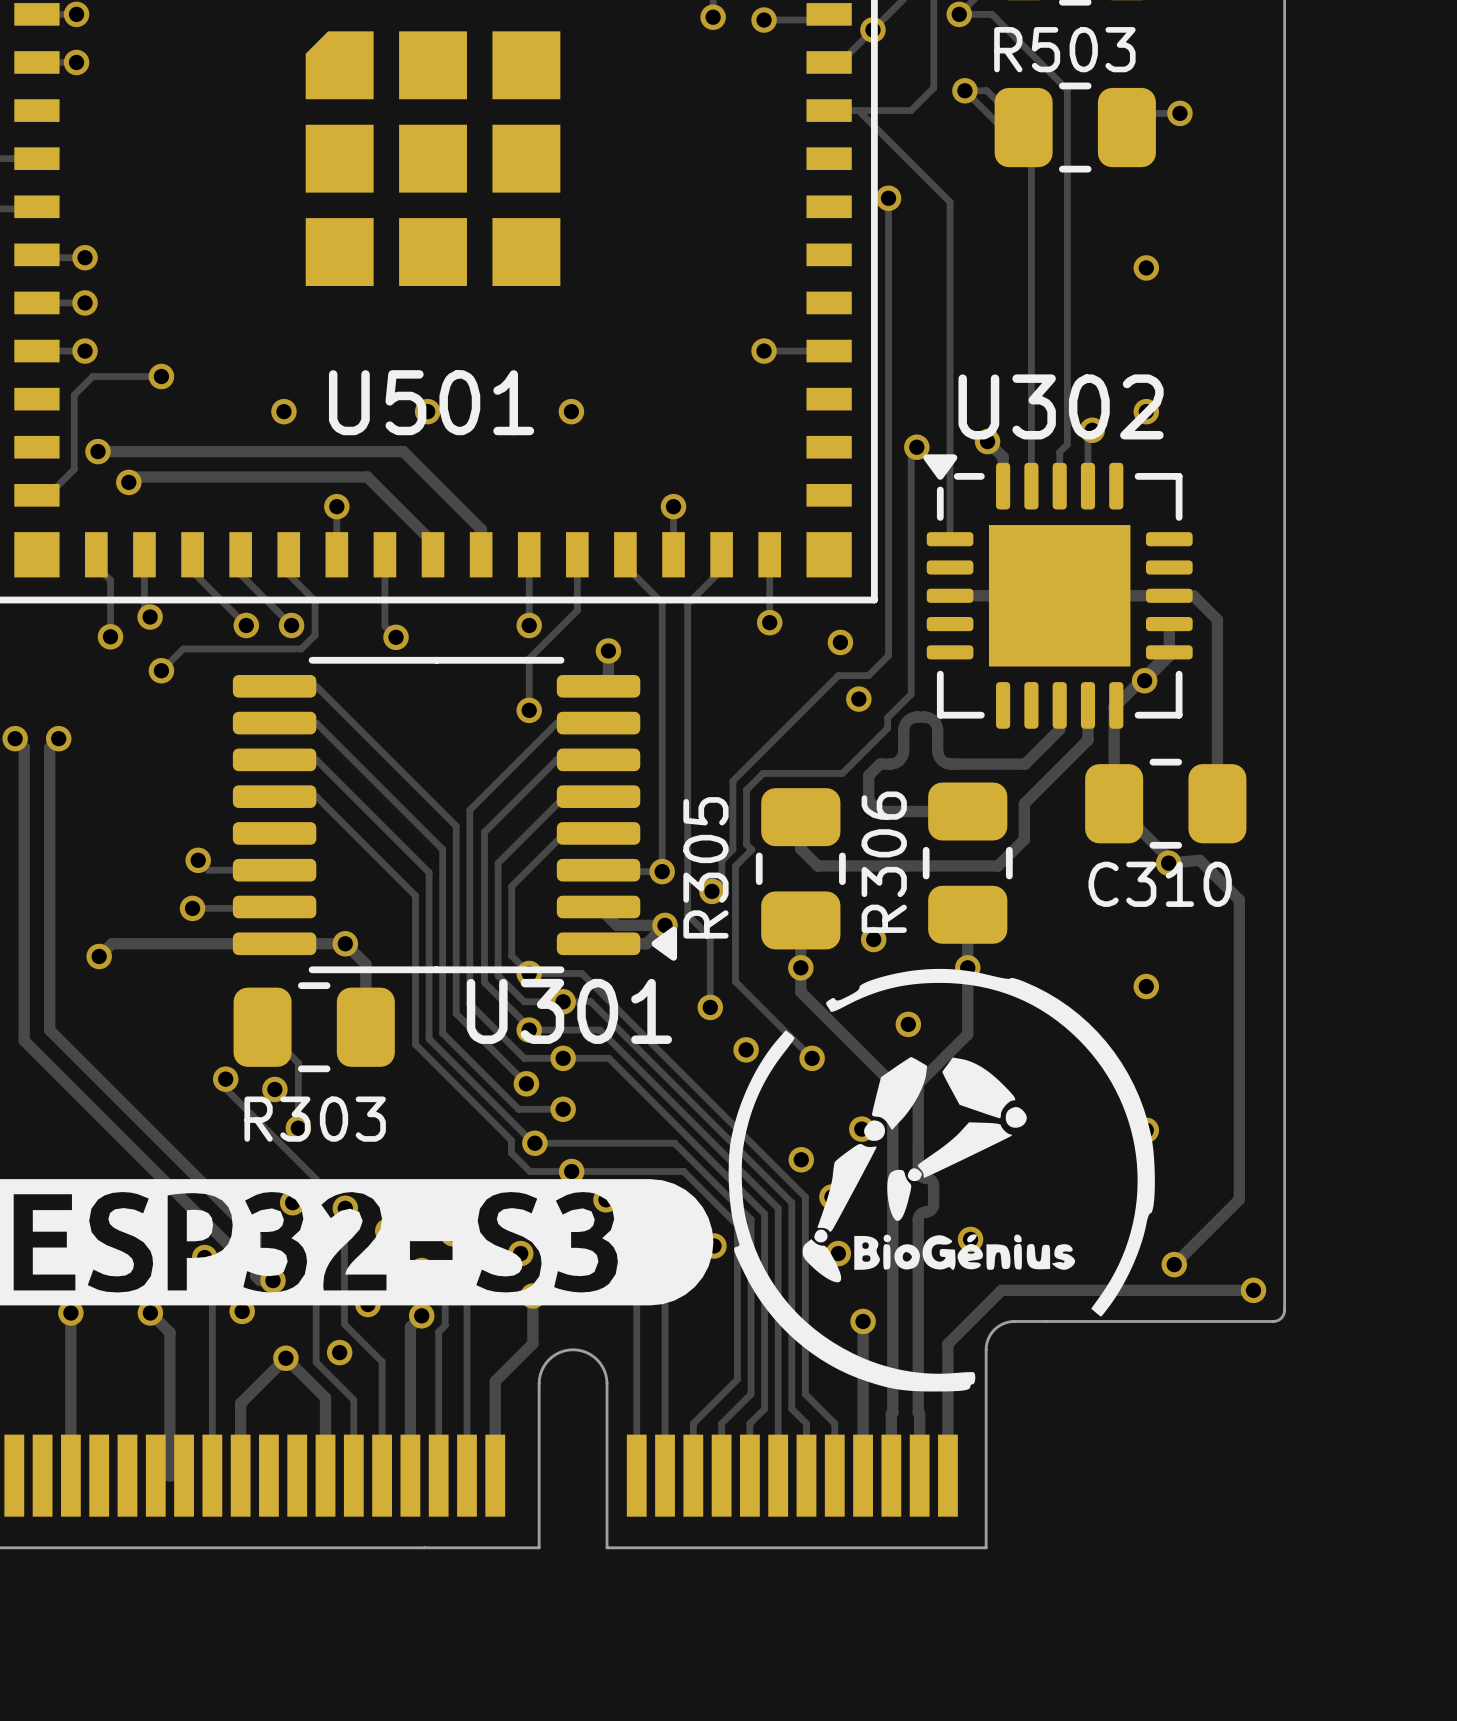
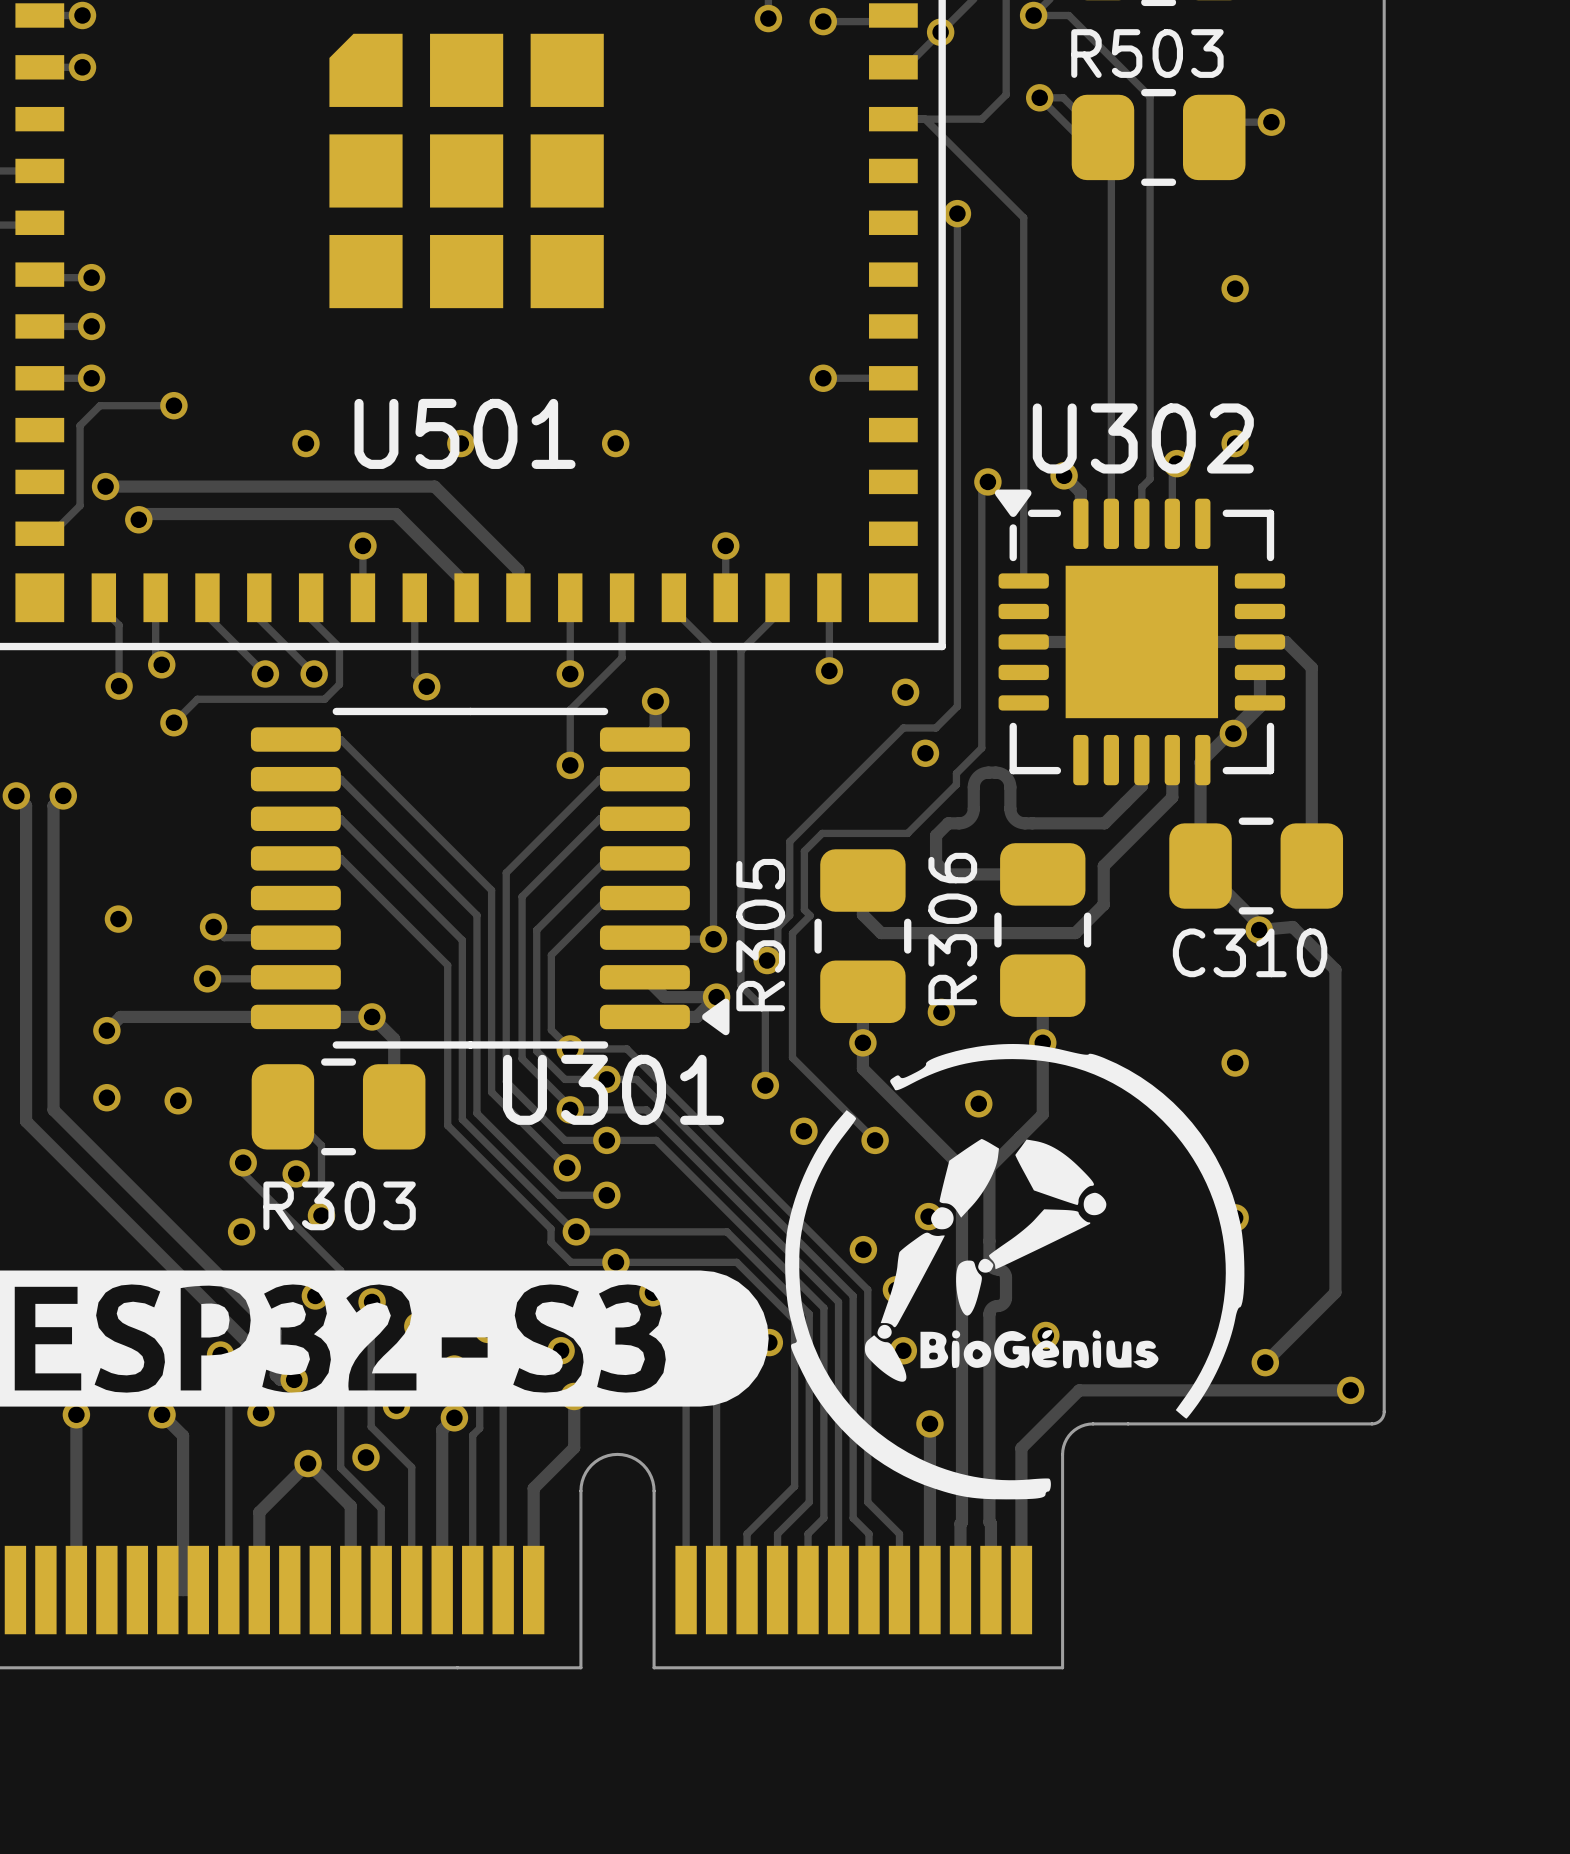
via: none -> (118, 919)
via: none -> (106, 1097)
via: none -> (178, 1100)
via: none -> (241, 1231)

